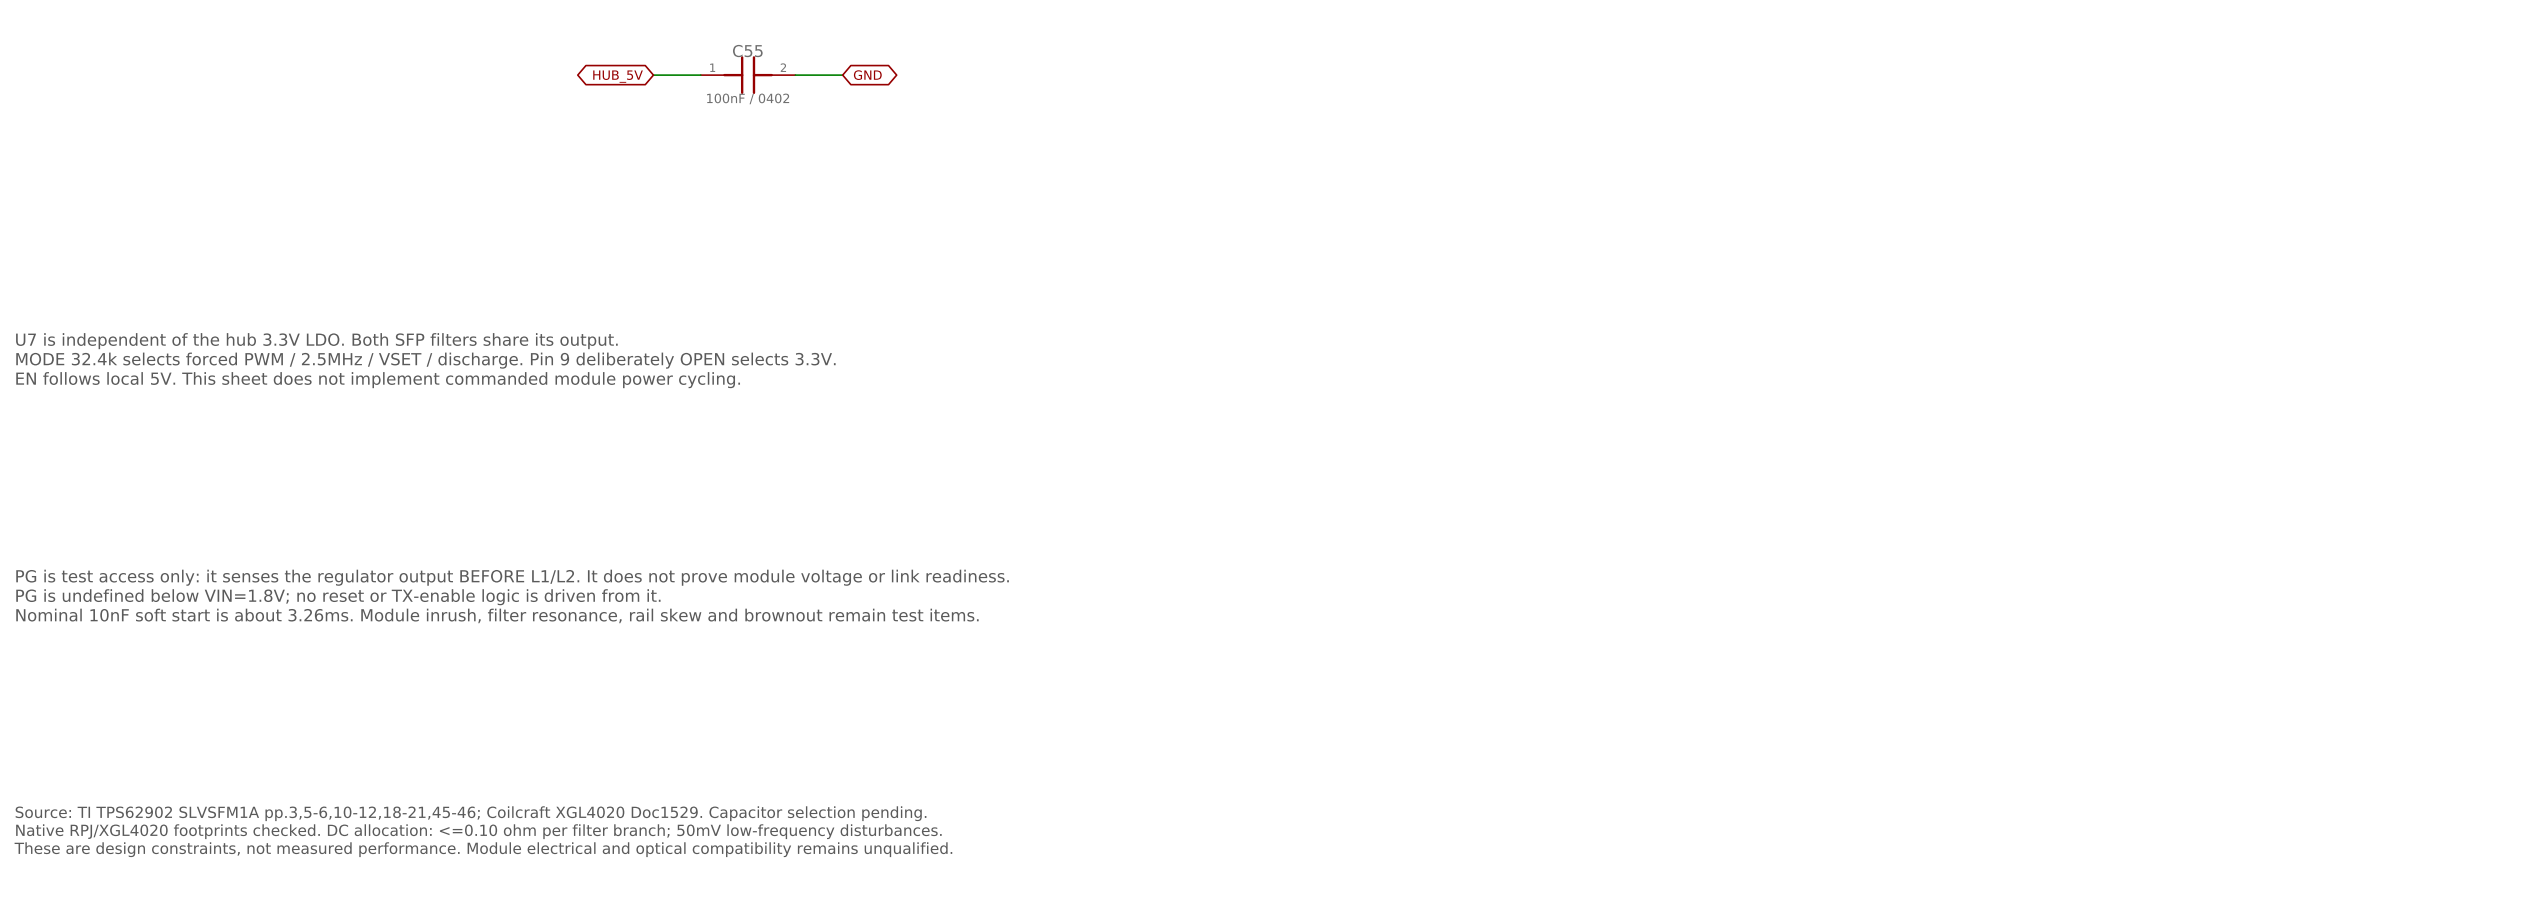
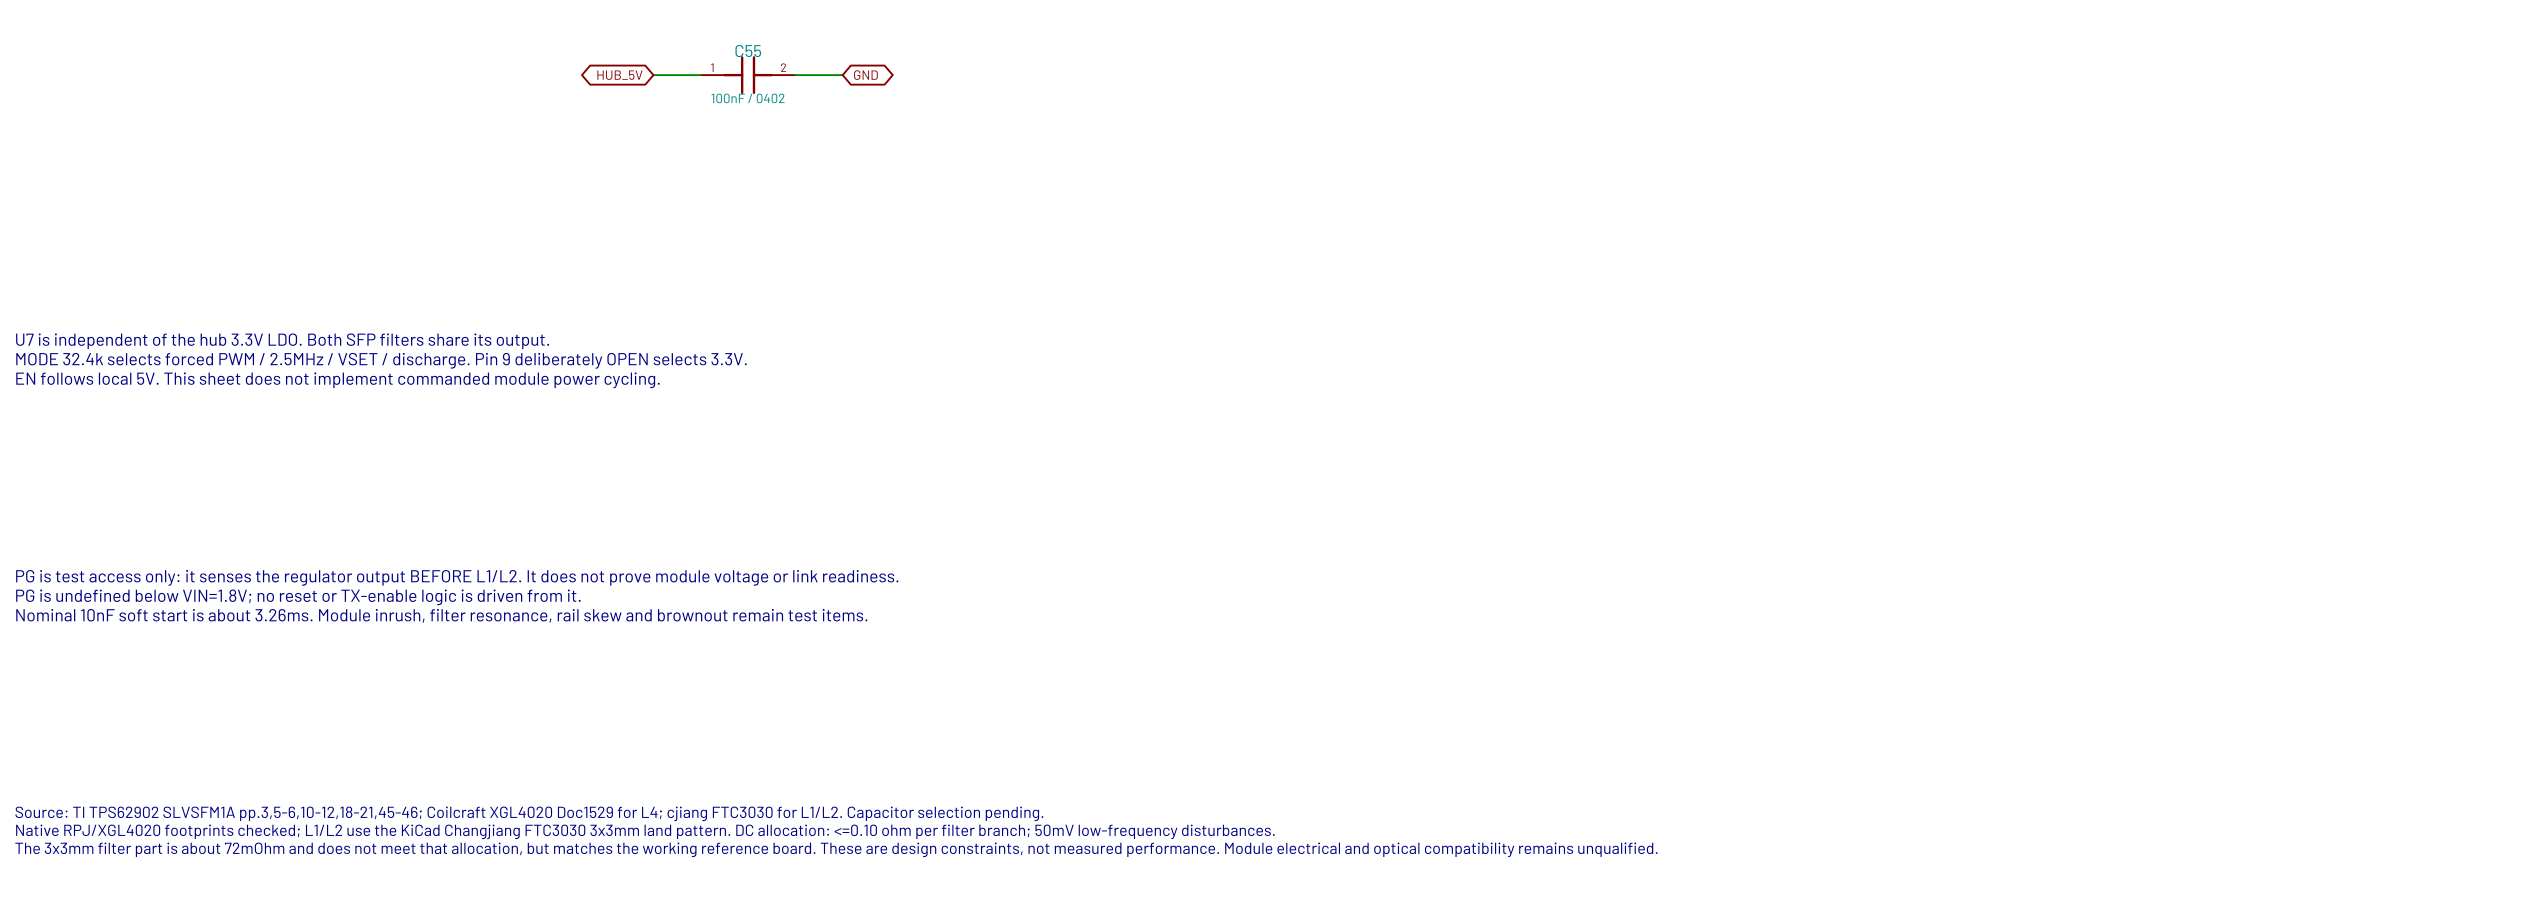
text: Source: TI TPS62902 SLVSFM1A pp.3,5-6,10-12,18-21,45-46; Coilcraft XGL4020 Doc1529. Capacitor selection pending. (471, 813) -> Source: TI TPS62902 SLVSFM1A pp.3,5-6,10-12,18-21,45-46; Coilcraft XGL4020 Doc1529 for L4; cjiang FTC3030 for L1/L2. Capacitor selection pending. (529, 813)
text: Native RPJ/XGL4020 footprints checked. DC allocation: <=0.10 ohm per filter branch; 50mV low-frequency disturbances. (478, 831) -> Native RPJ/XGL4020 footprints checked; L1/L2 use the KiCad Changjiang FTC3030 3x3mm land pattern. DC allocation: <=0.10 ohm per filter branch; 50mV low-frequency disturbances. (645, 831)
text: These are design constraints, not measured performance. Module electrical and optical compatibility remains unqualified. (483, 849) -> The 3x3mm filter part is about 72mOhm and does not meet that allocation, but matches the working reference board. These are design constraints, not measured performance. Module electrical and optical compatibility remains unqualified. (836, 849)

